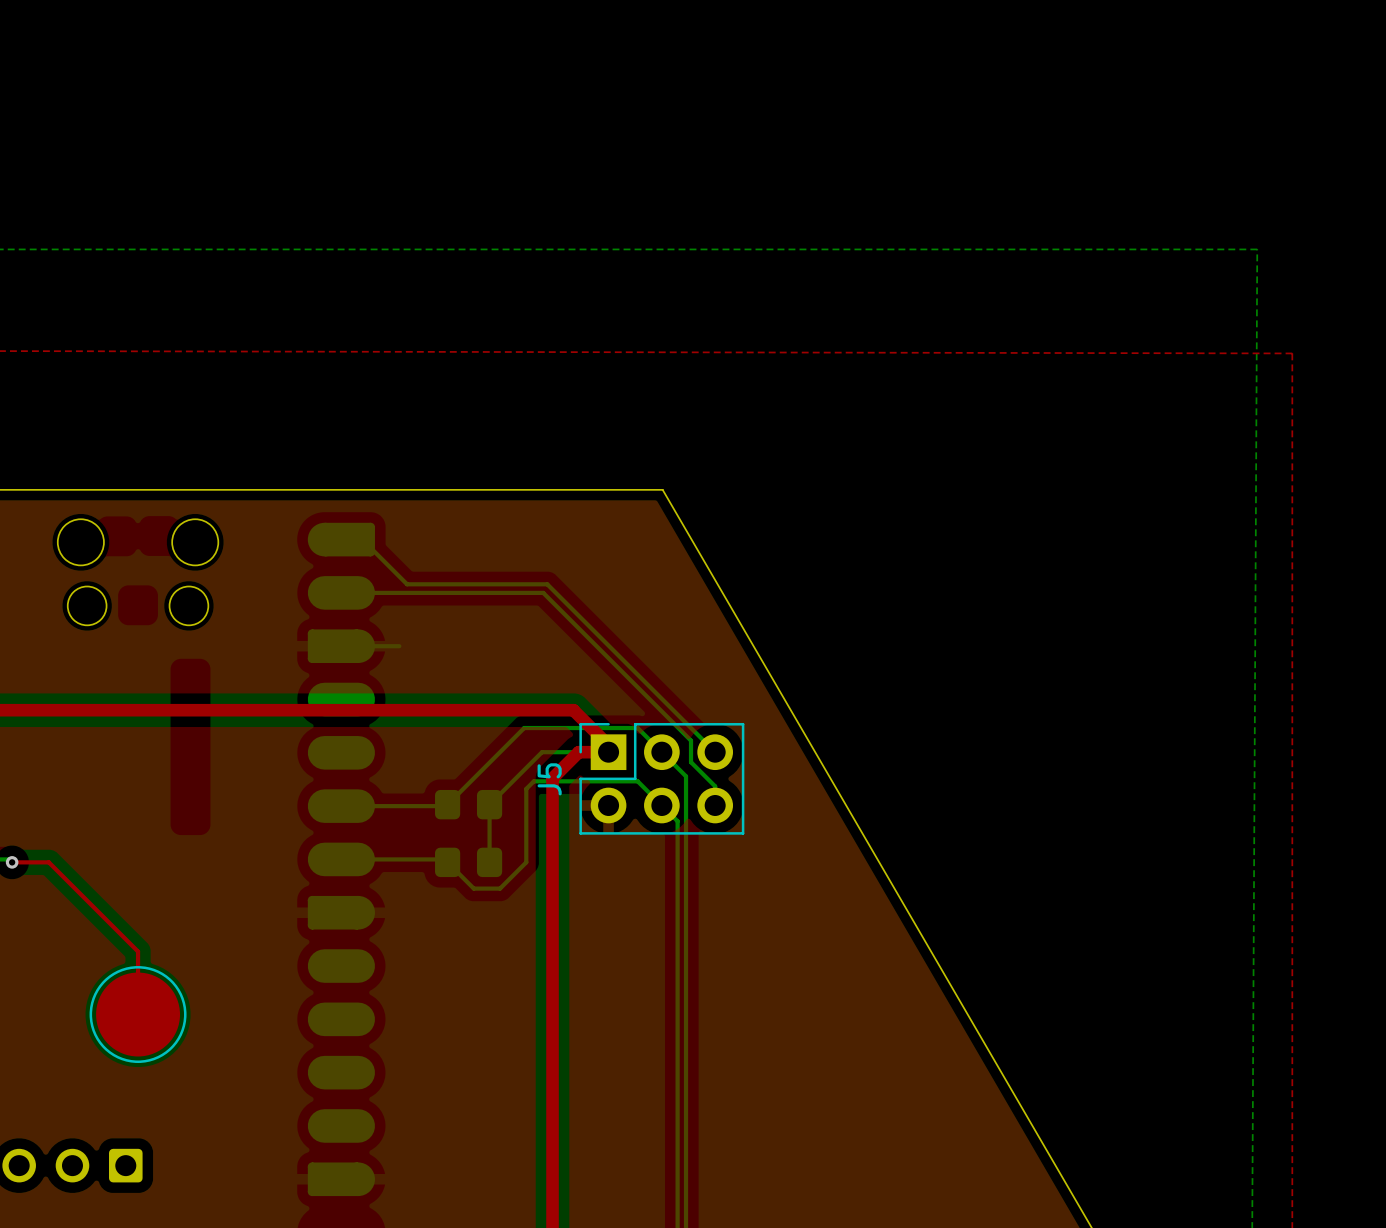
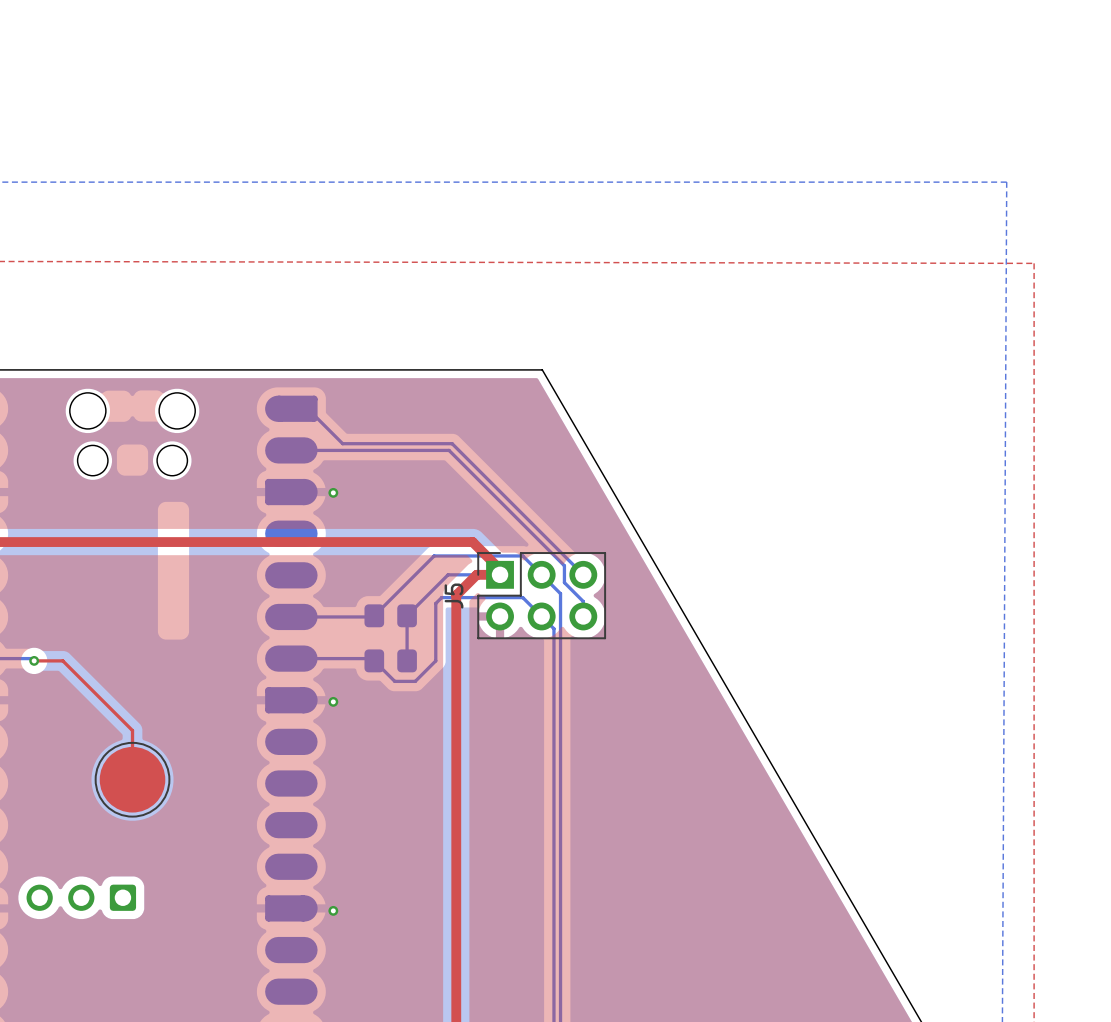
via: none -> (333, 492)
via: none -> (333, 701)
via: none -> (333, 910)

